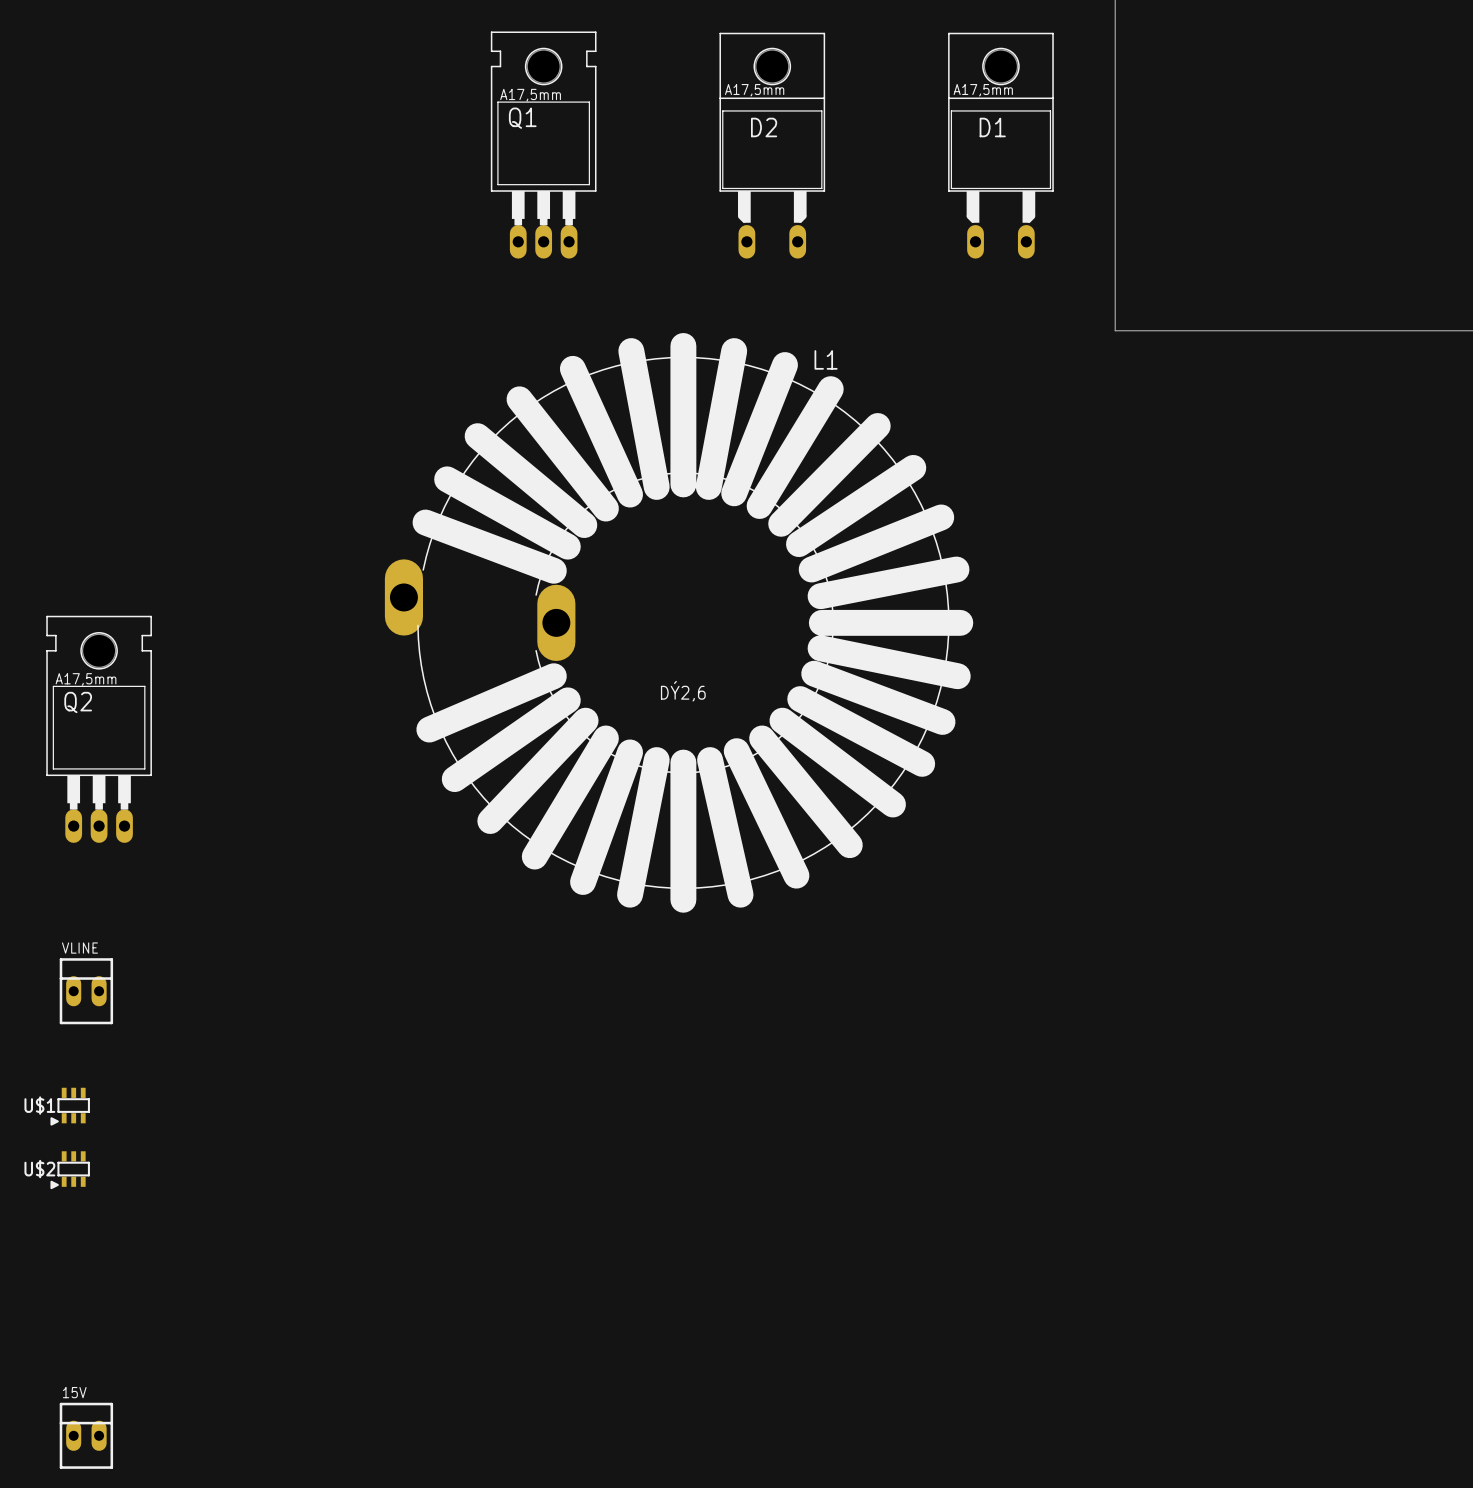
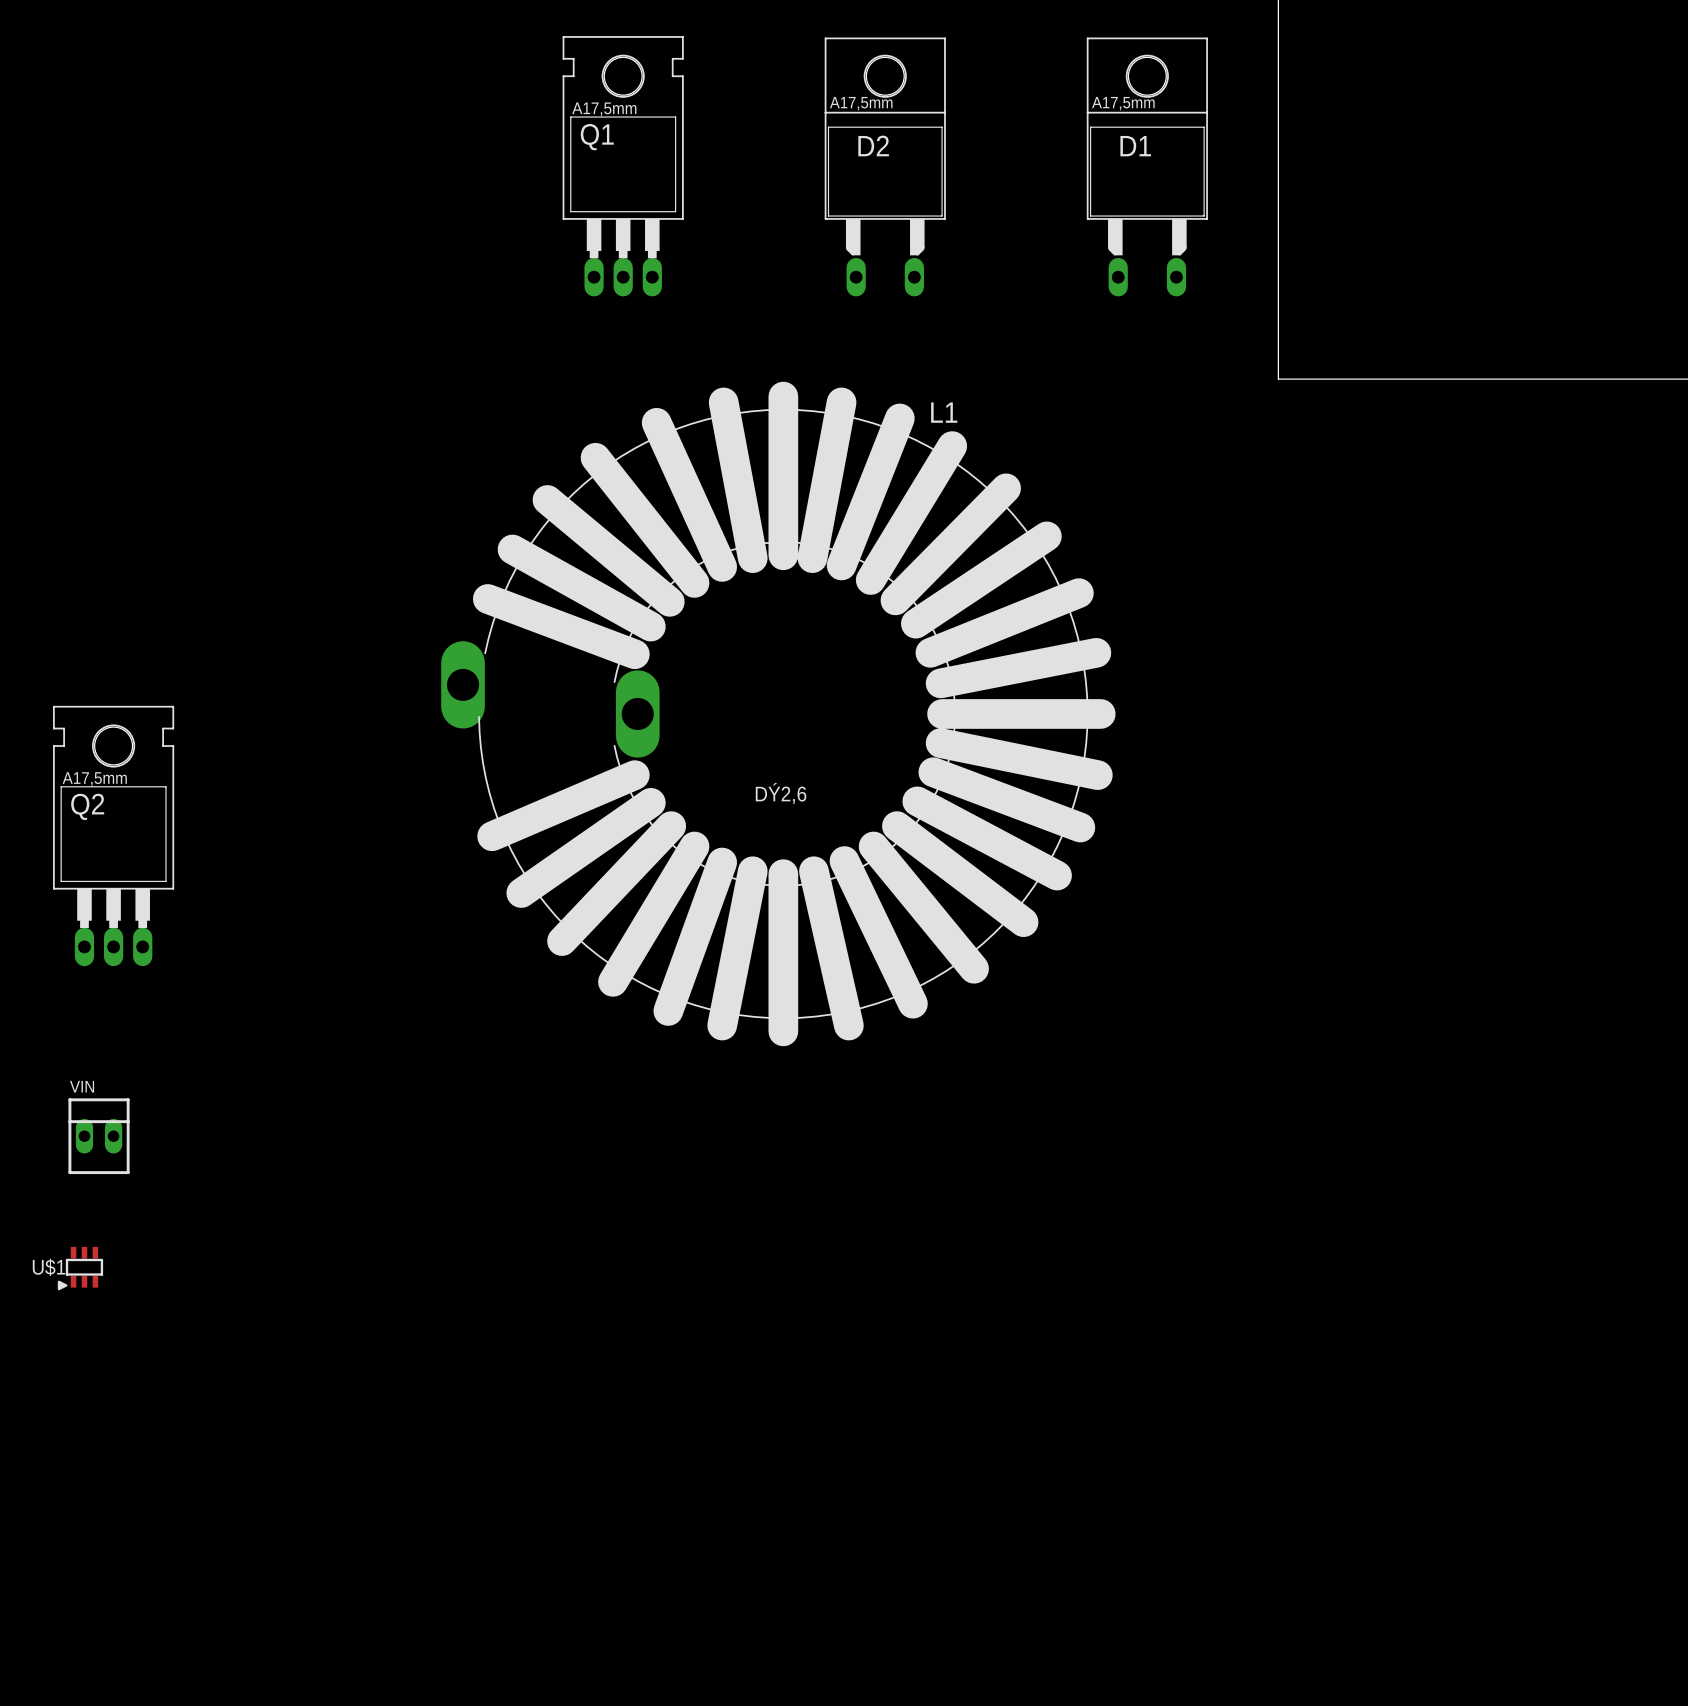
VLINE name: VLINE (79, 948) -> VIN (82, 1086)
U$2: (70, 1170) -> none
15V: (86, 1435) -> none

